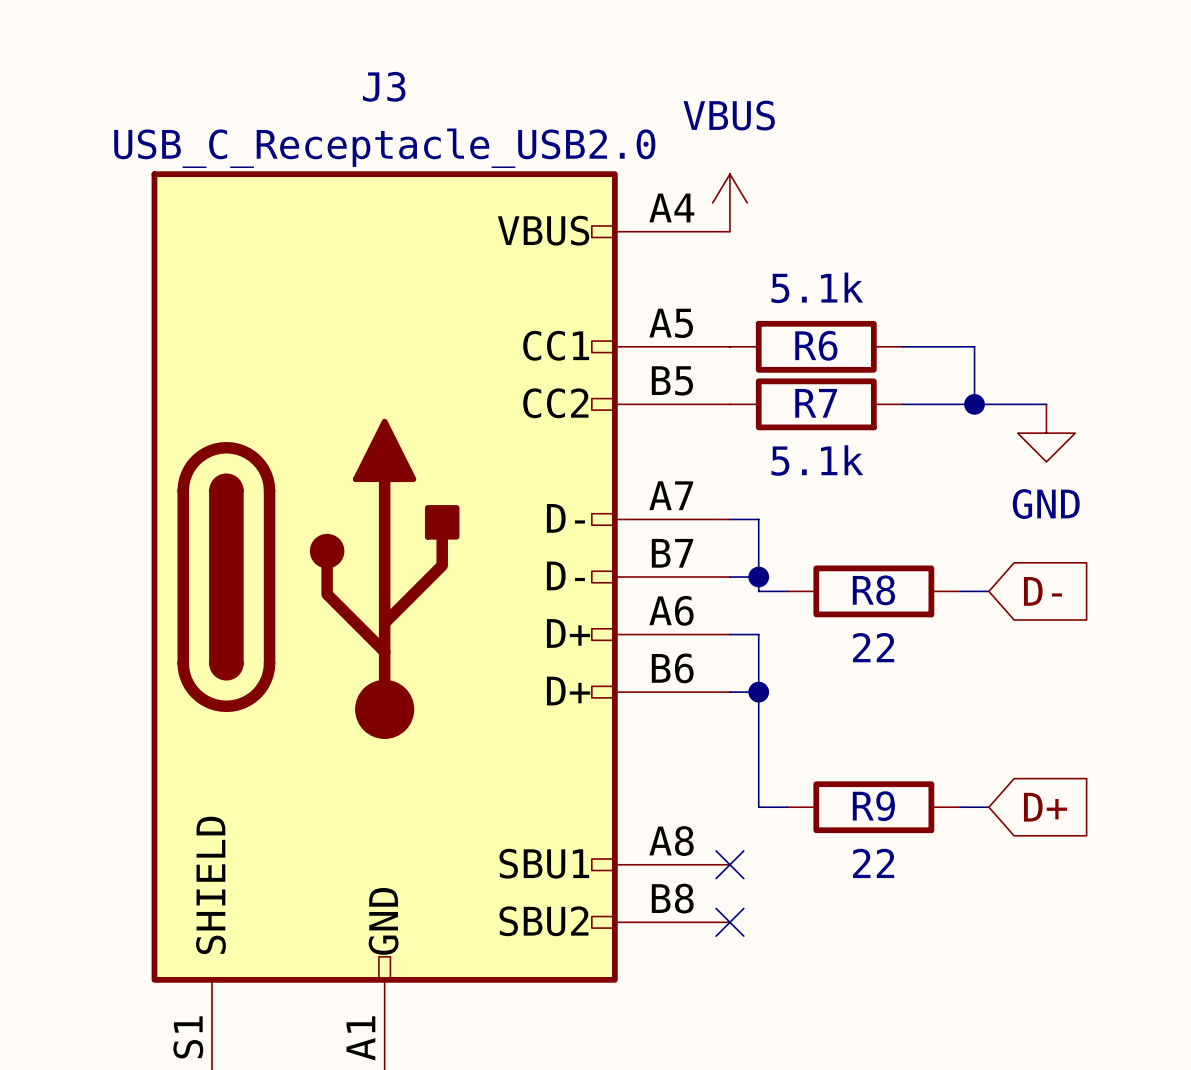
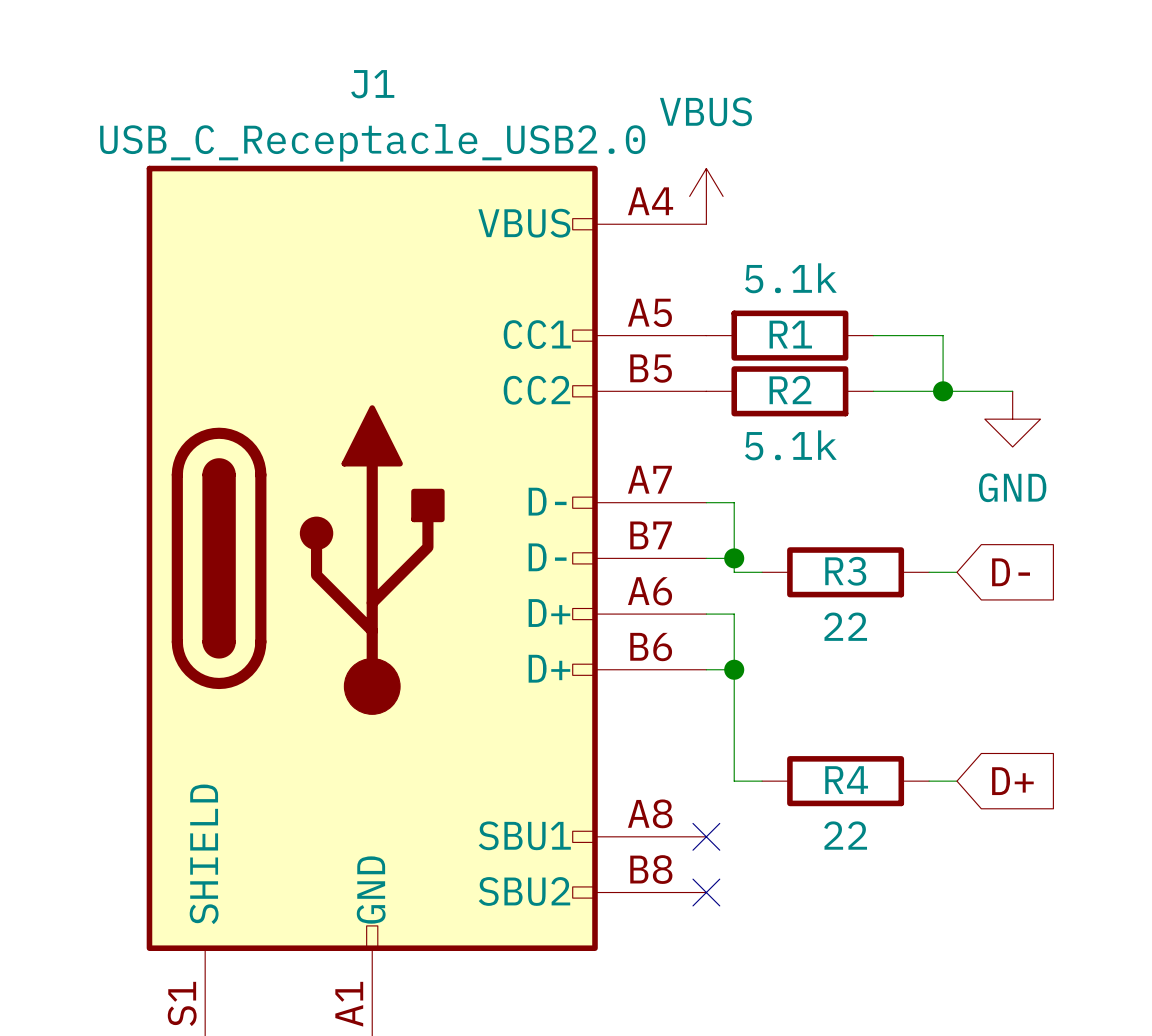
J3 name: J3 (384, 86) -> J1 (372, 84)
R6 name: R6 (816, 345) -> R1 (790, 334)
R7 name: R7 (816, 403) -> R2 (790, 390)
R8 name: R8 (873, 590) -> R3 (845, 571)
R9 name: R9 (873, 806) -> R4 (846, 780)

